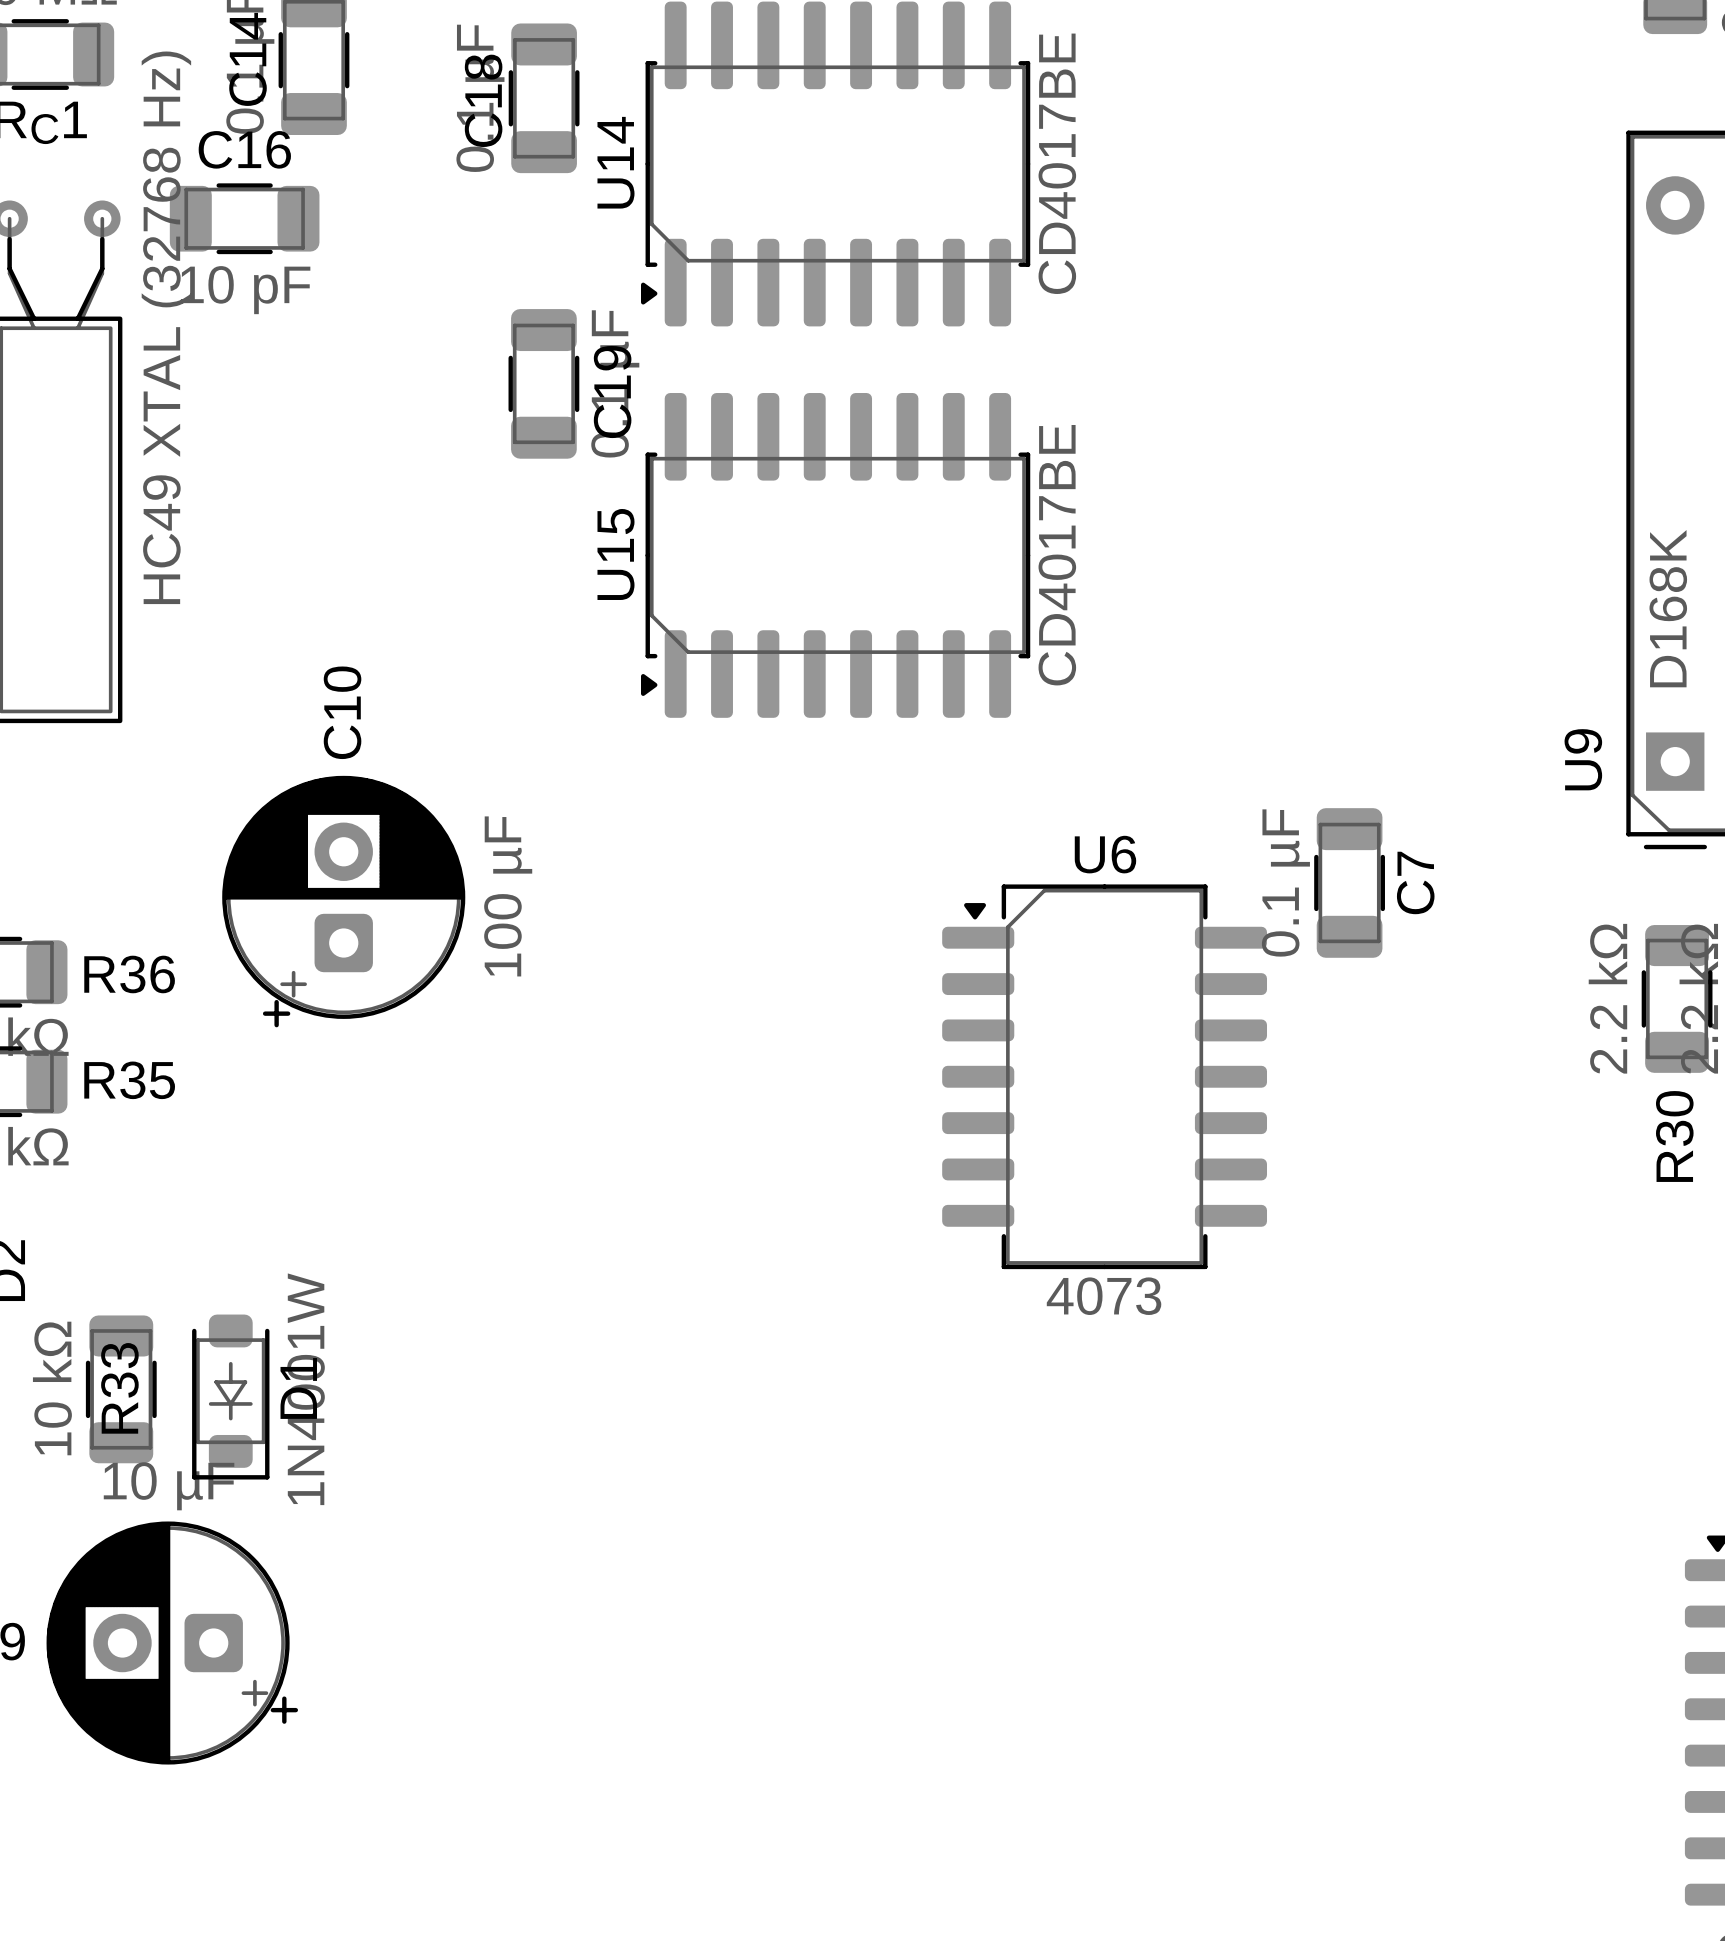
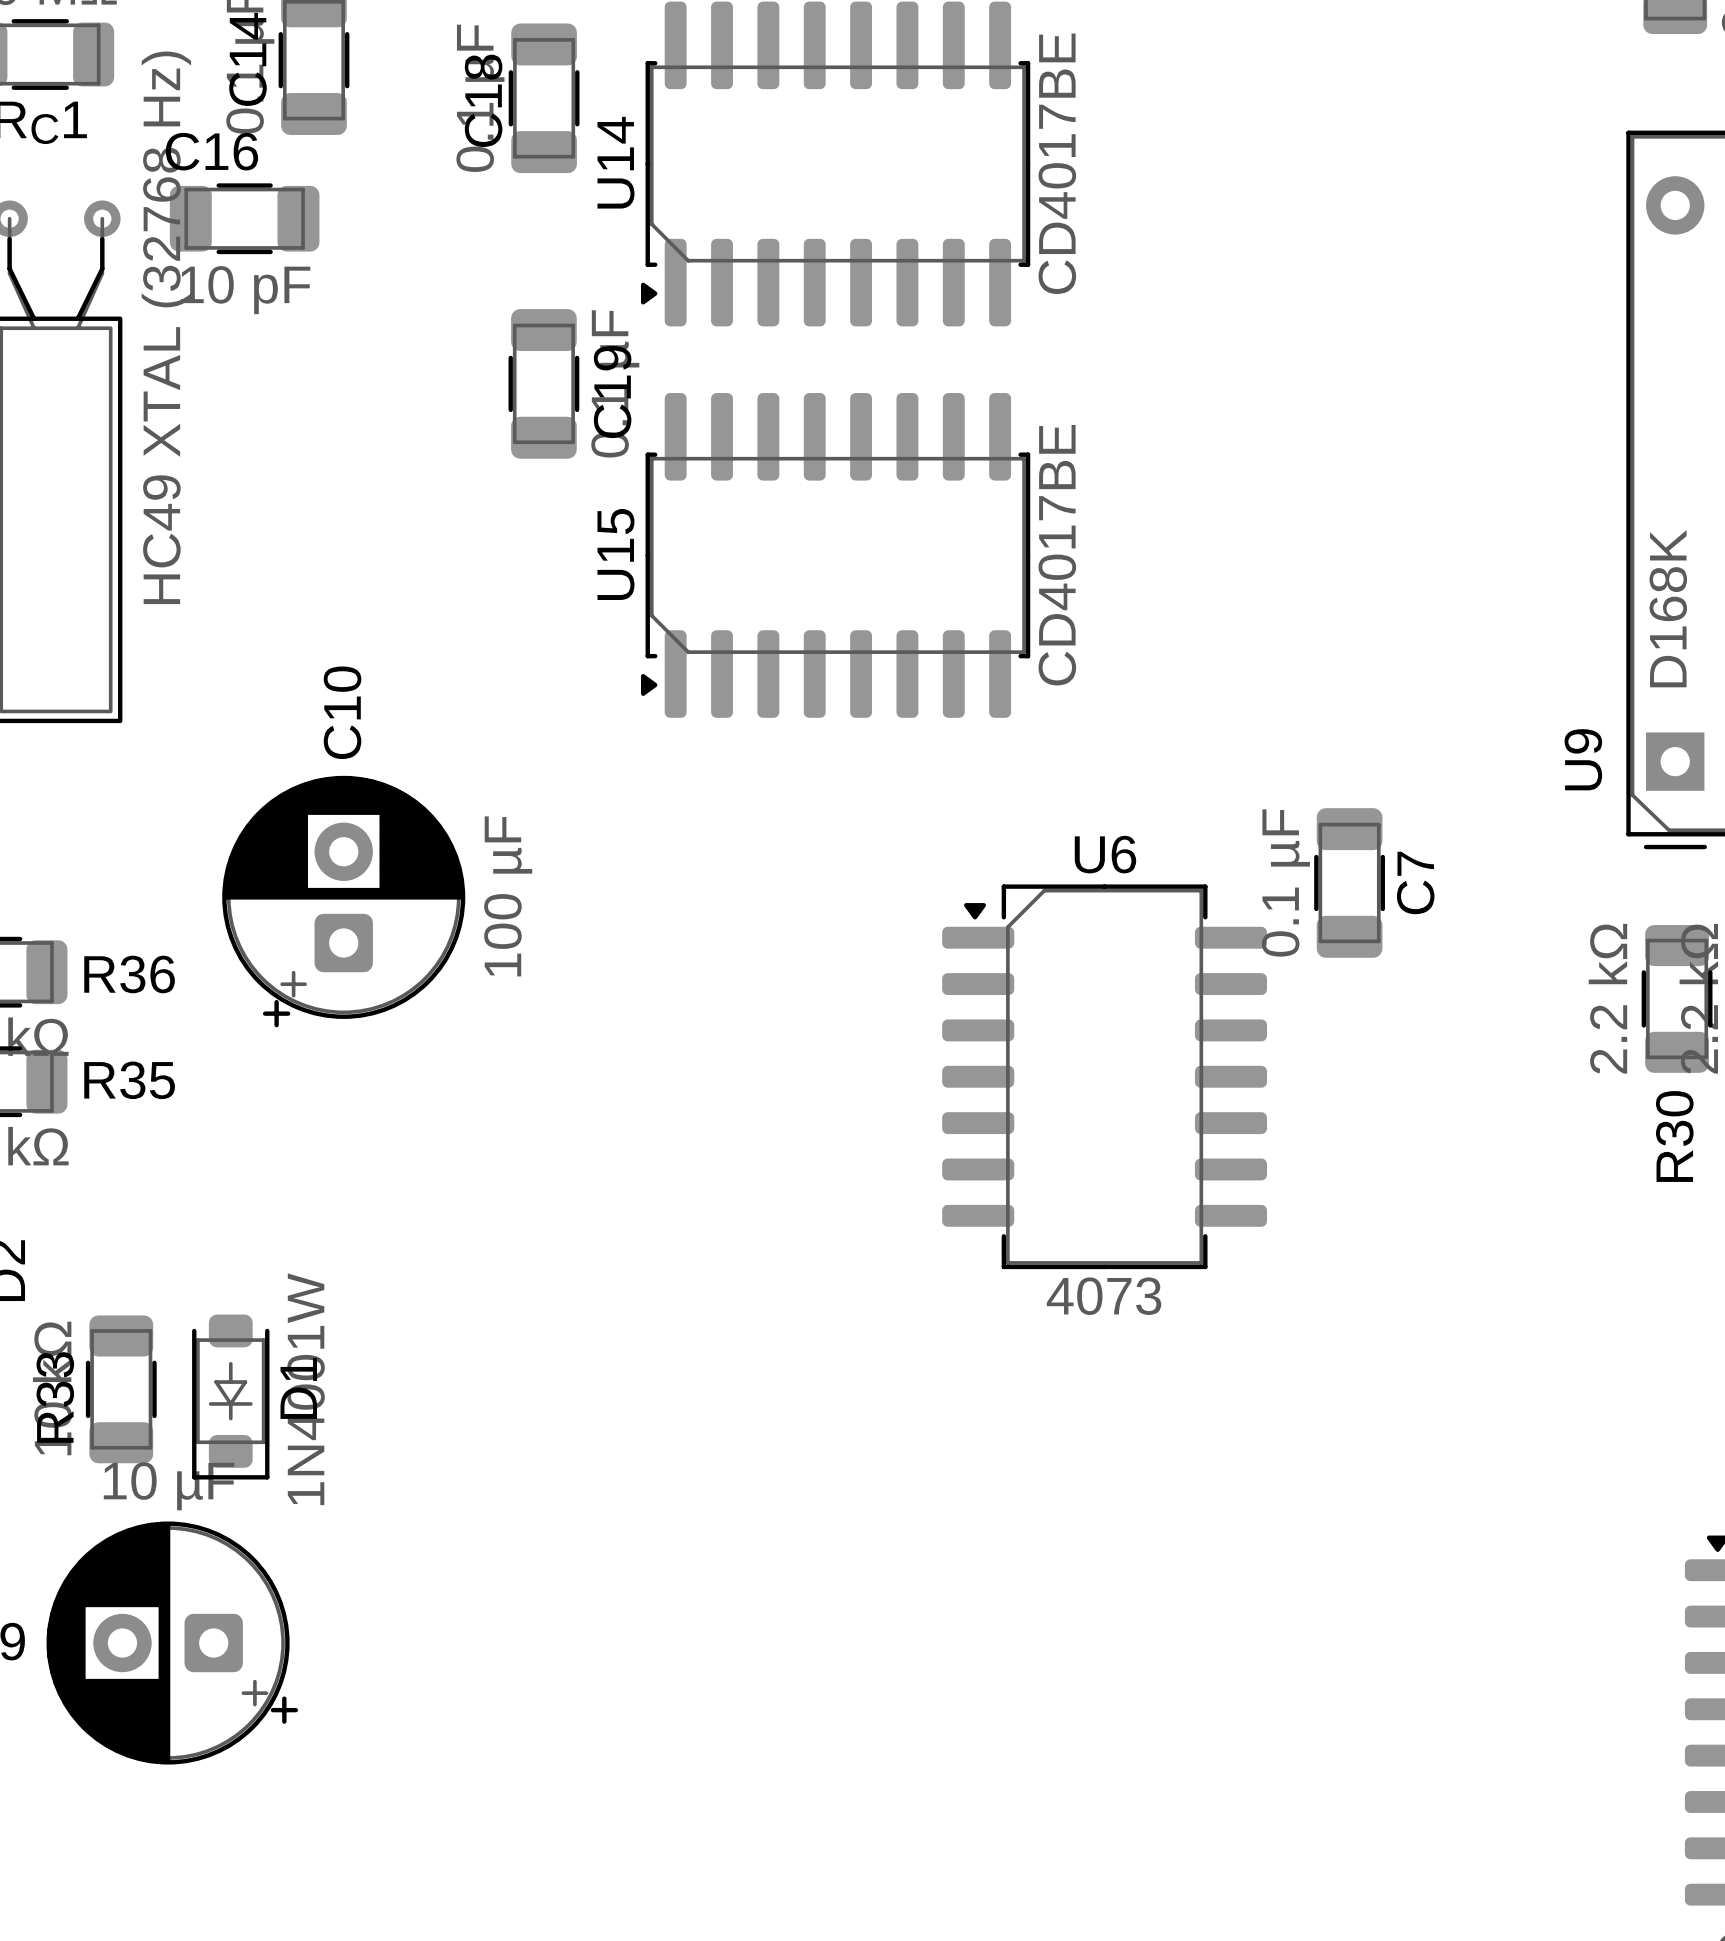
C16 name position: C16 (244, 149) -> C16 (211, 151)
R33 name position: R33 (119, 1388) -> R33 (55, 1397)

